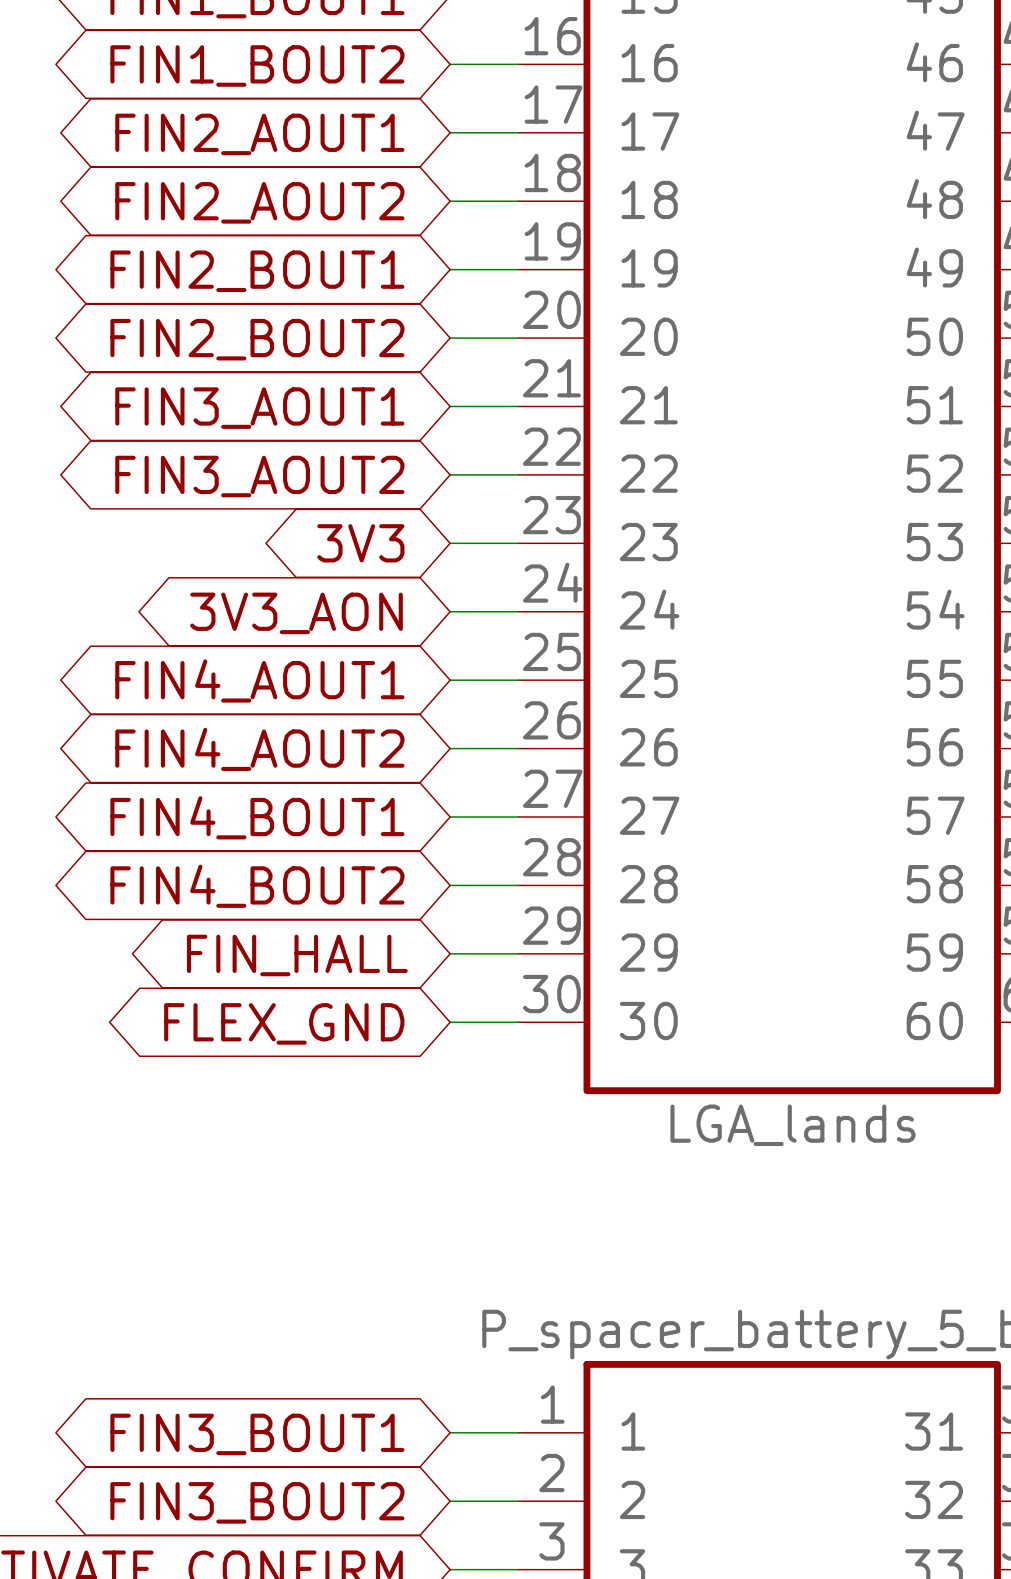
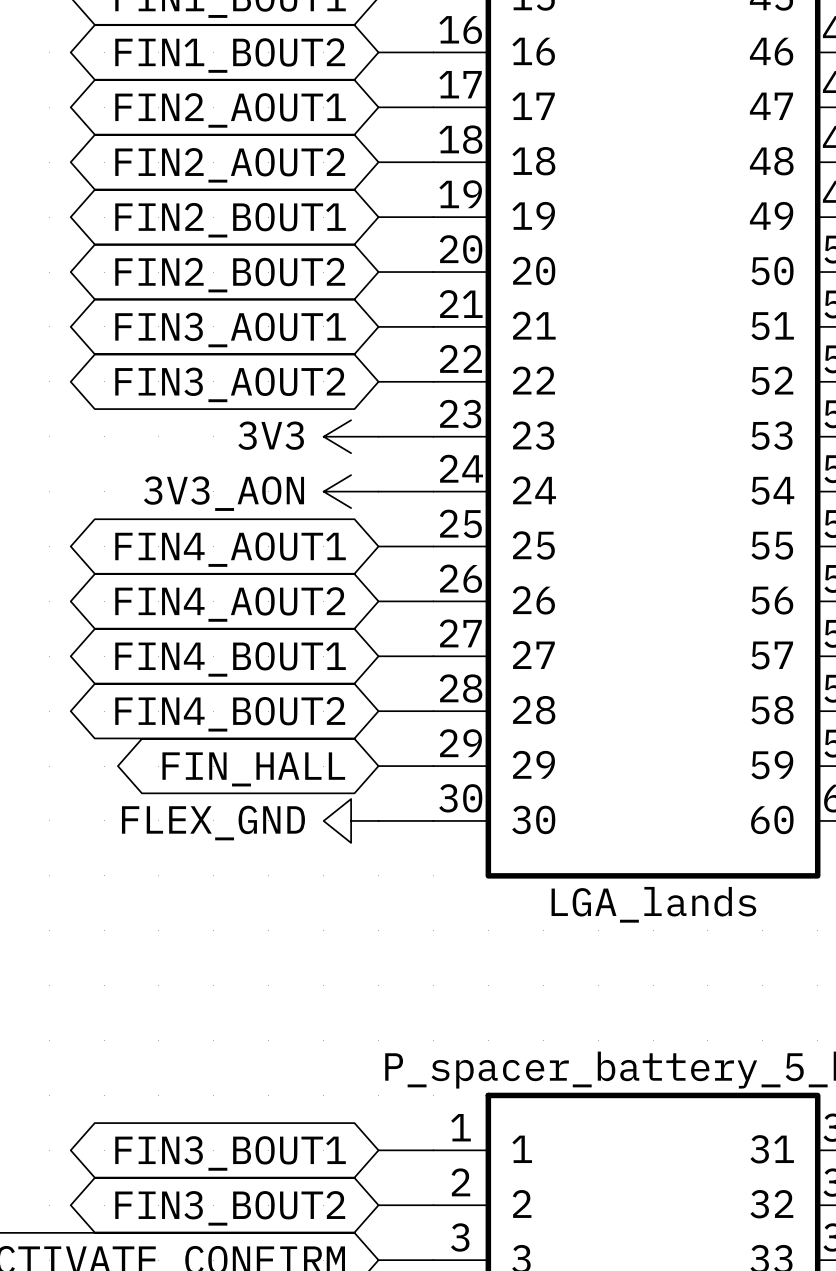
global label: 3V3 (360, 543) -> none
power symbol: none -> 3V3 (351, 436)
power symbol: none -> 3V3_AON (351, 491)
global label: 3V3_AON (296, 613) -> none
power symbol: none -> FLEX_GND (351, 820)
global label: FLEX_GND (284, 1023) -> none

